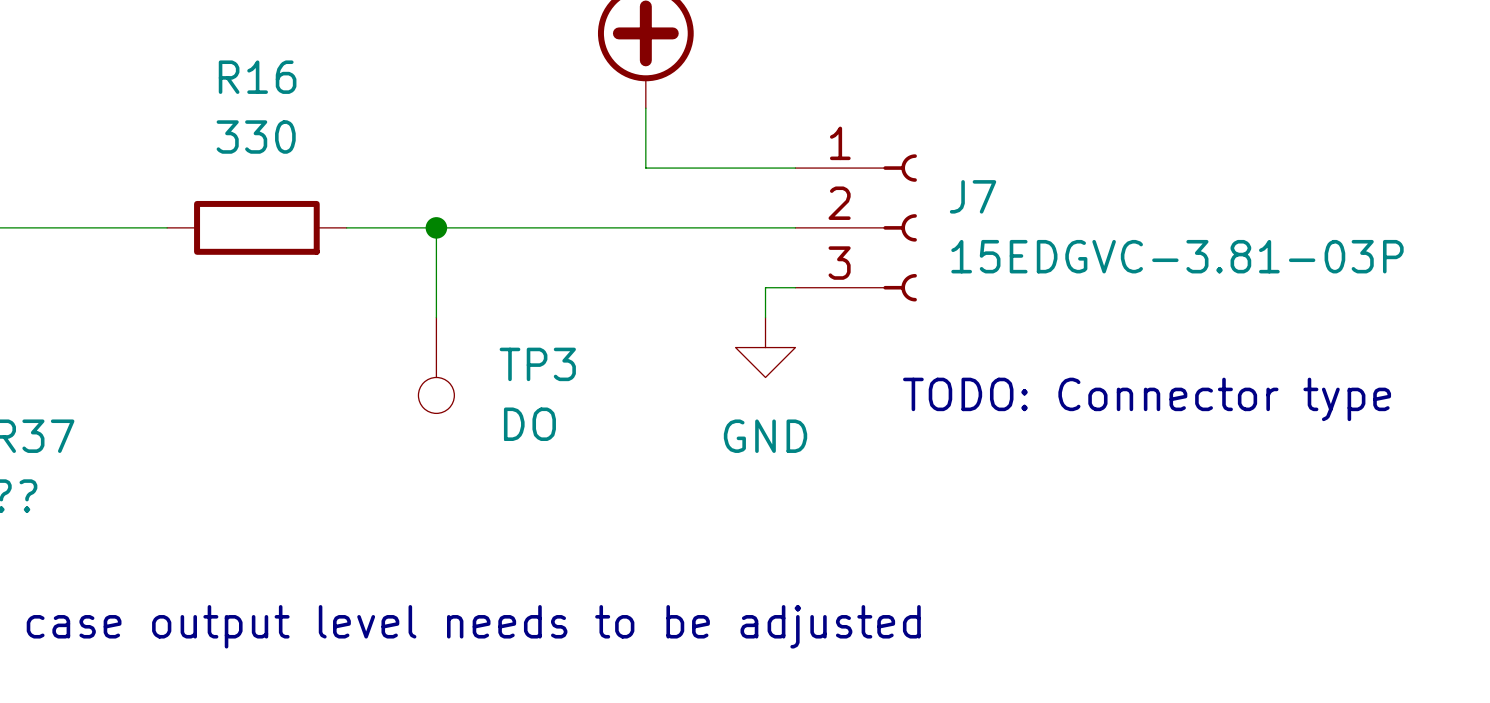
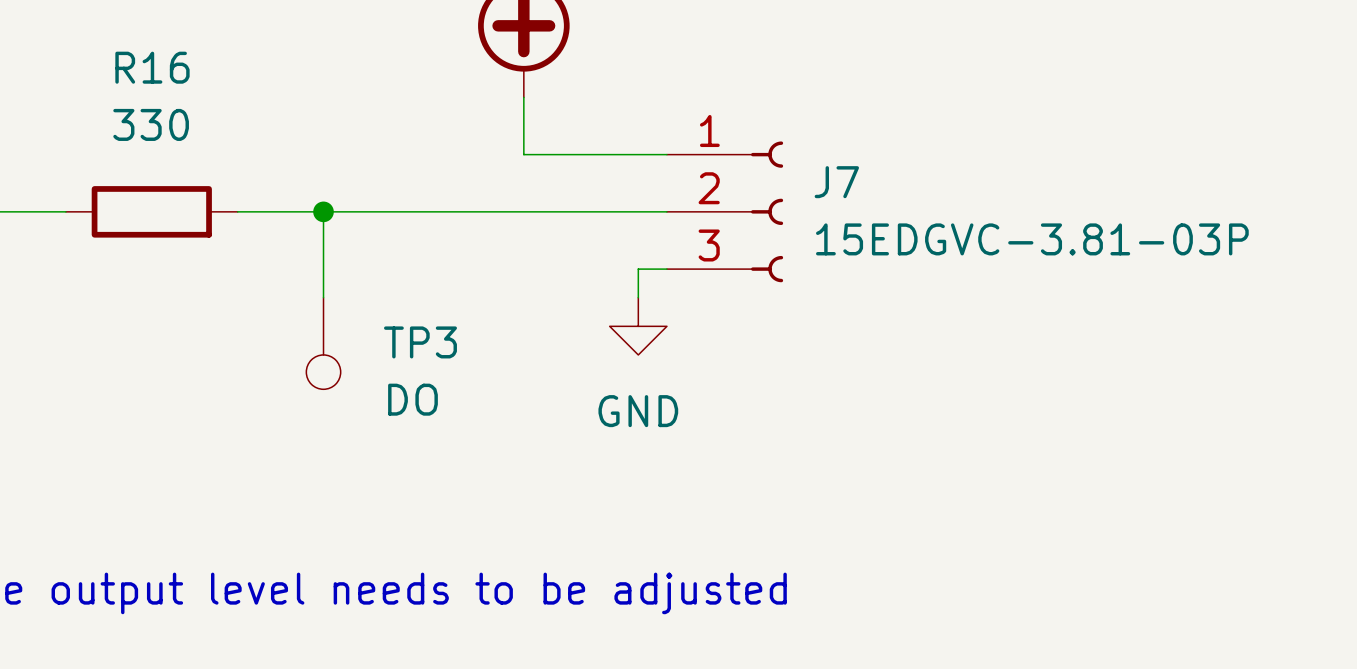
text: TODO: Connector type (1147, 399) -> none

